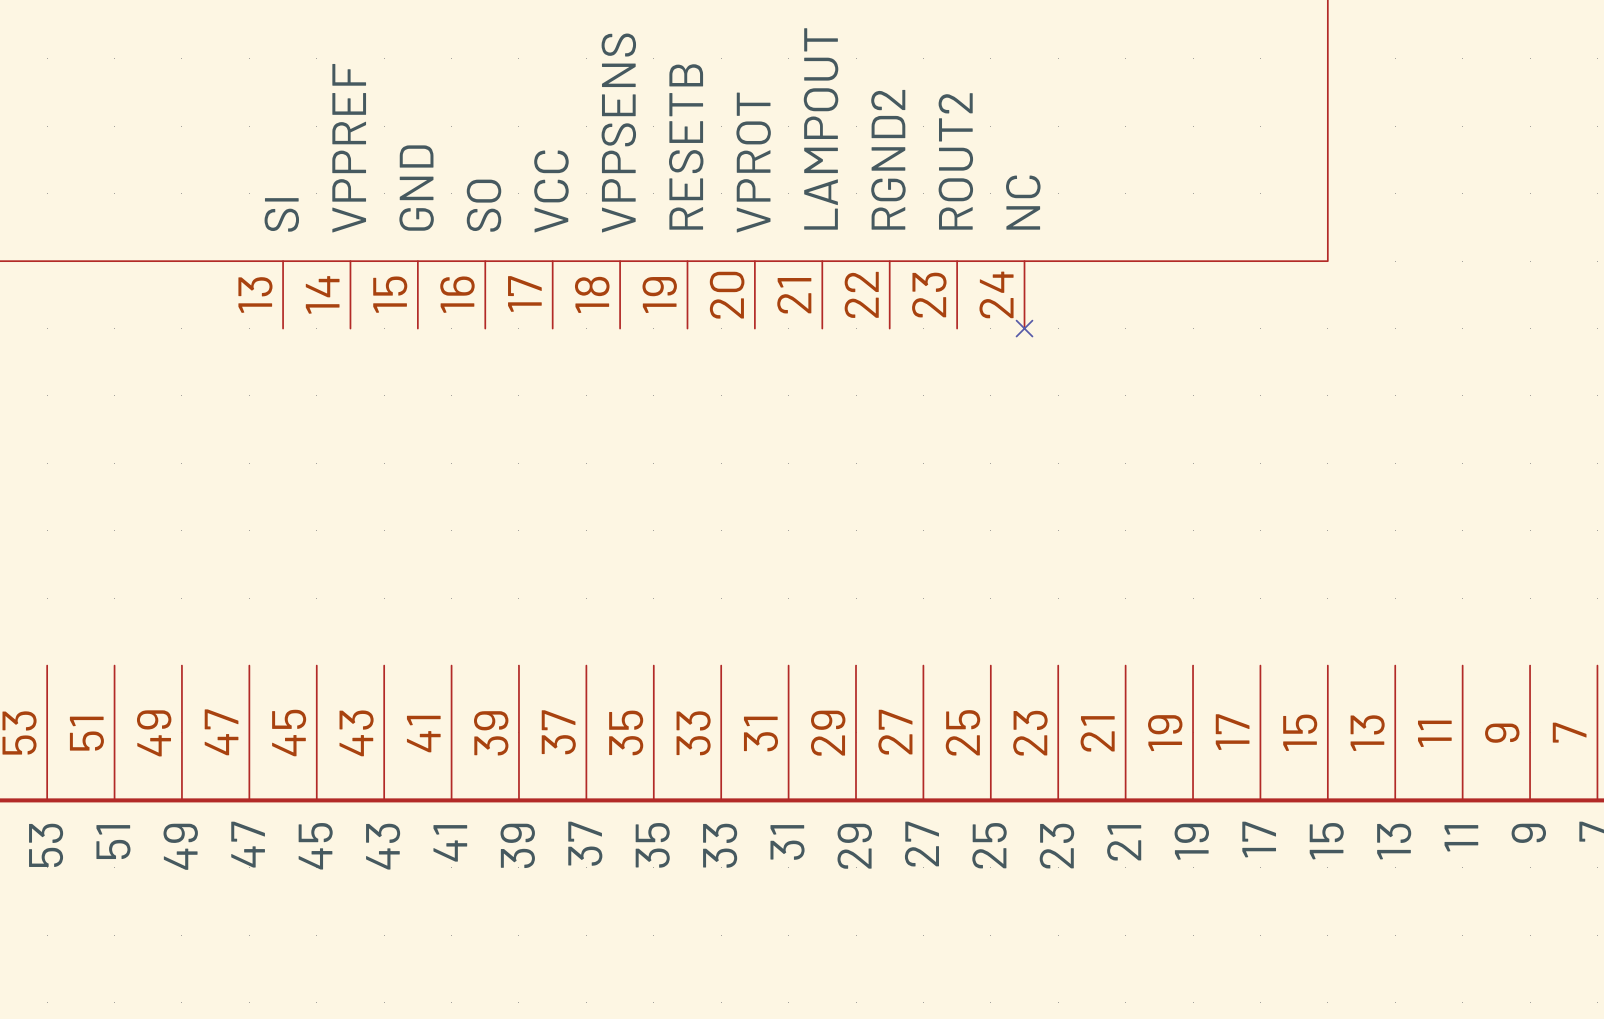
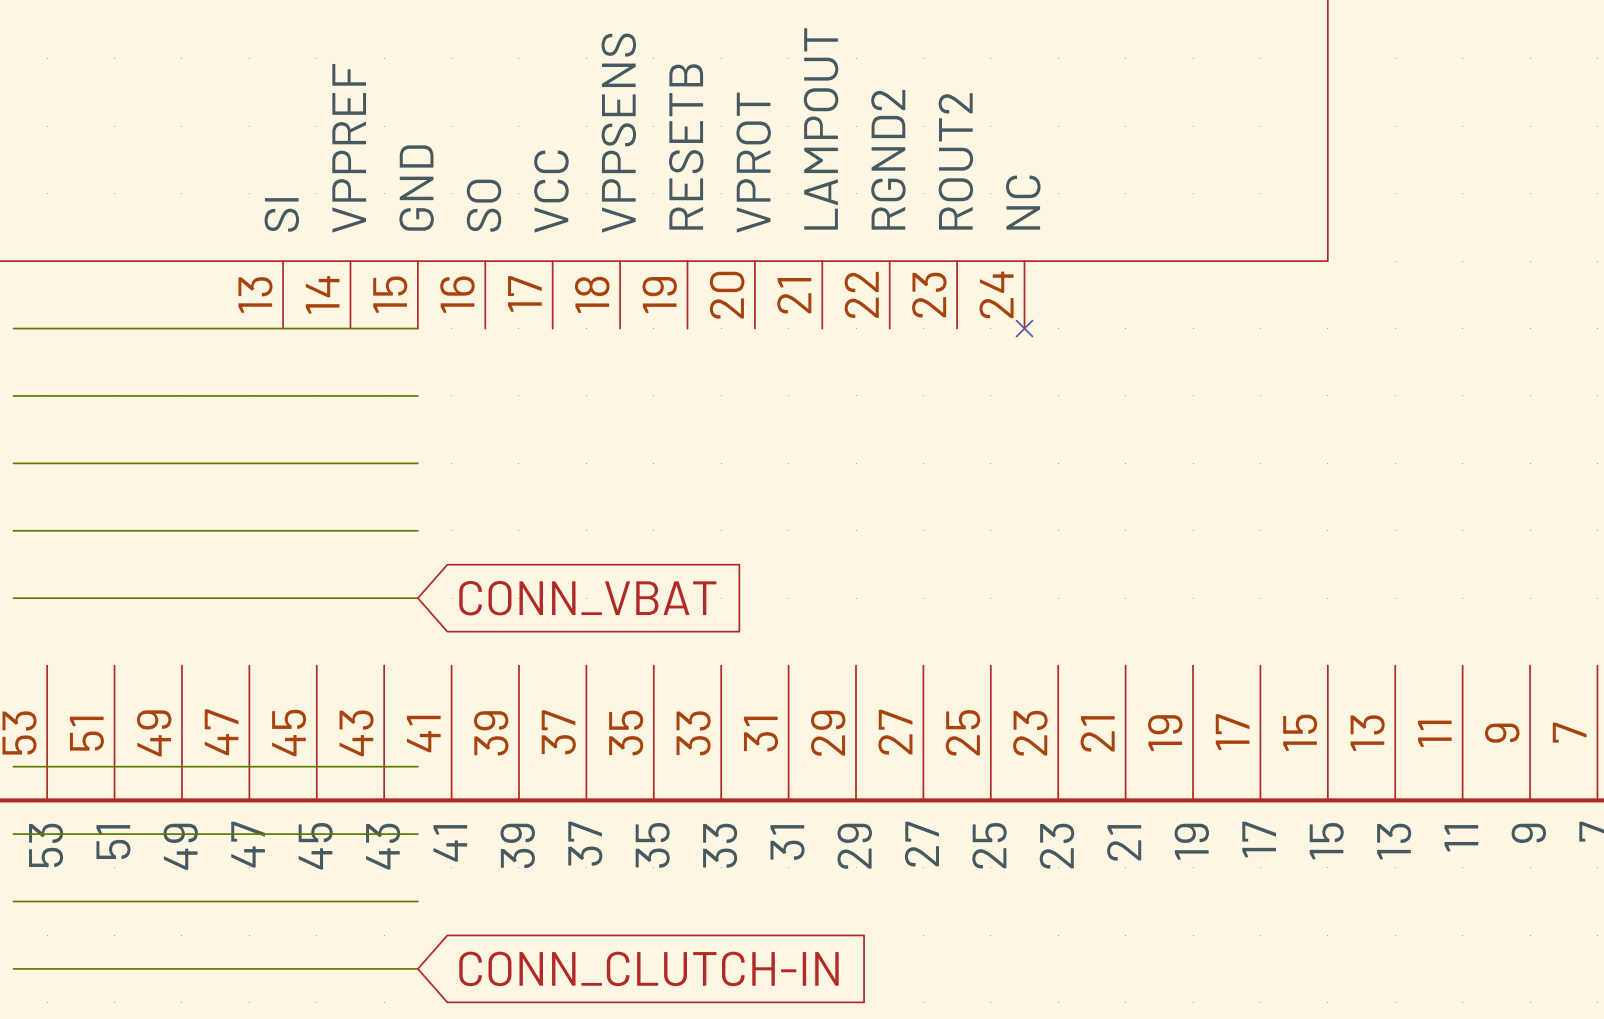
wire: none -> (13, 328) (417, 328)
wire: none -> (13, 395) (417, 395)
wire: none -> (13, 463) (417, 463)
wire: none -> (13, 530) (417, 530)
wire: none -> (13, 598) (417, 598)
global label: none -> CONN_VBAT (587, 598)
wire: none -> (13, 766) (417, 766)
wire: none -> (13, 834) (417, 834)
wire: none -> (13, 901) (417, 901)
wire: none -> (13, 968) (417, 968)
global label: none -> CONN_CLUTCH-IN (648, 968)

